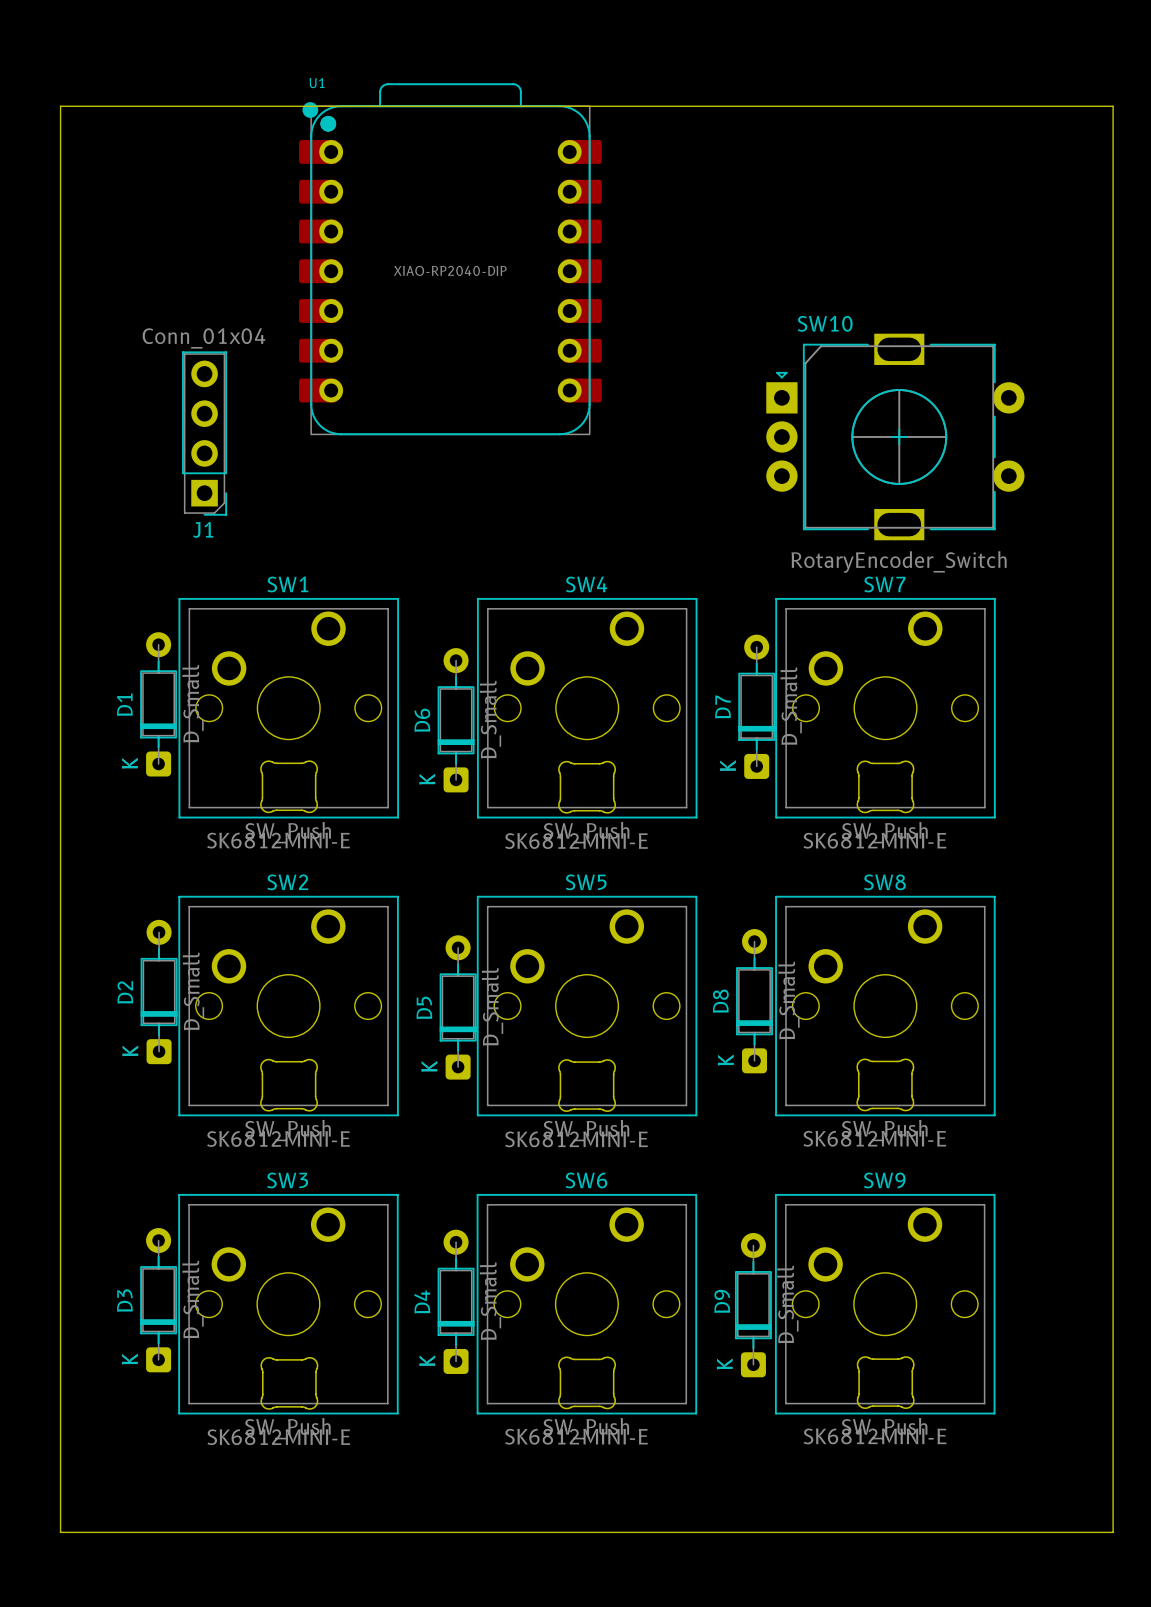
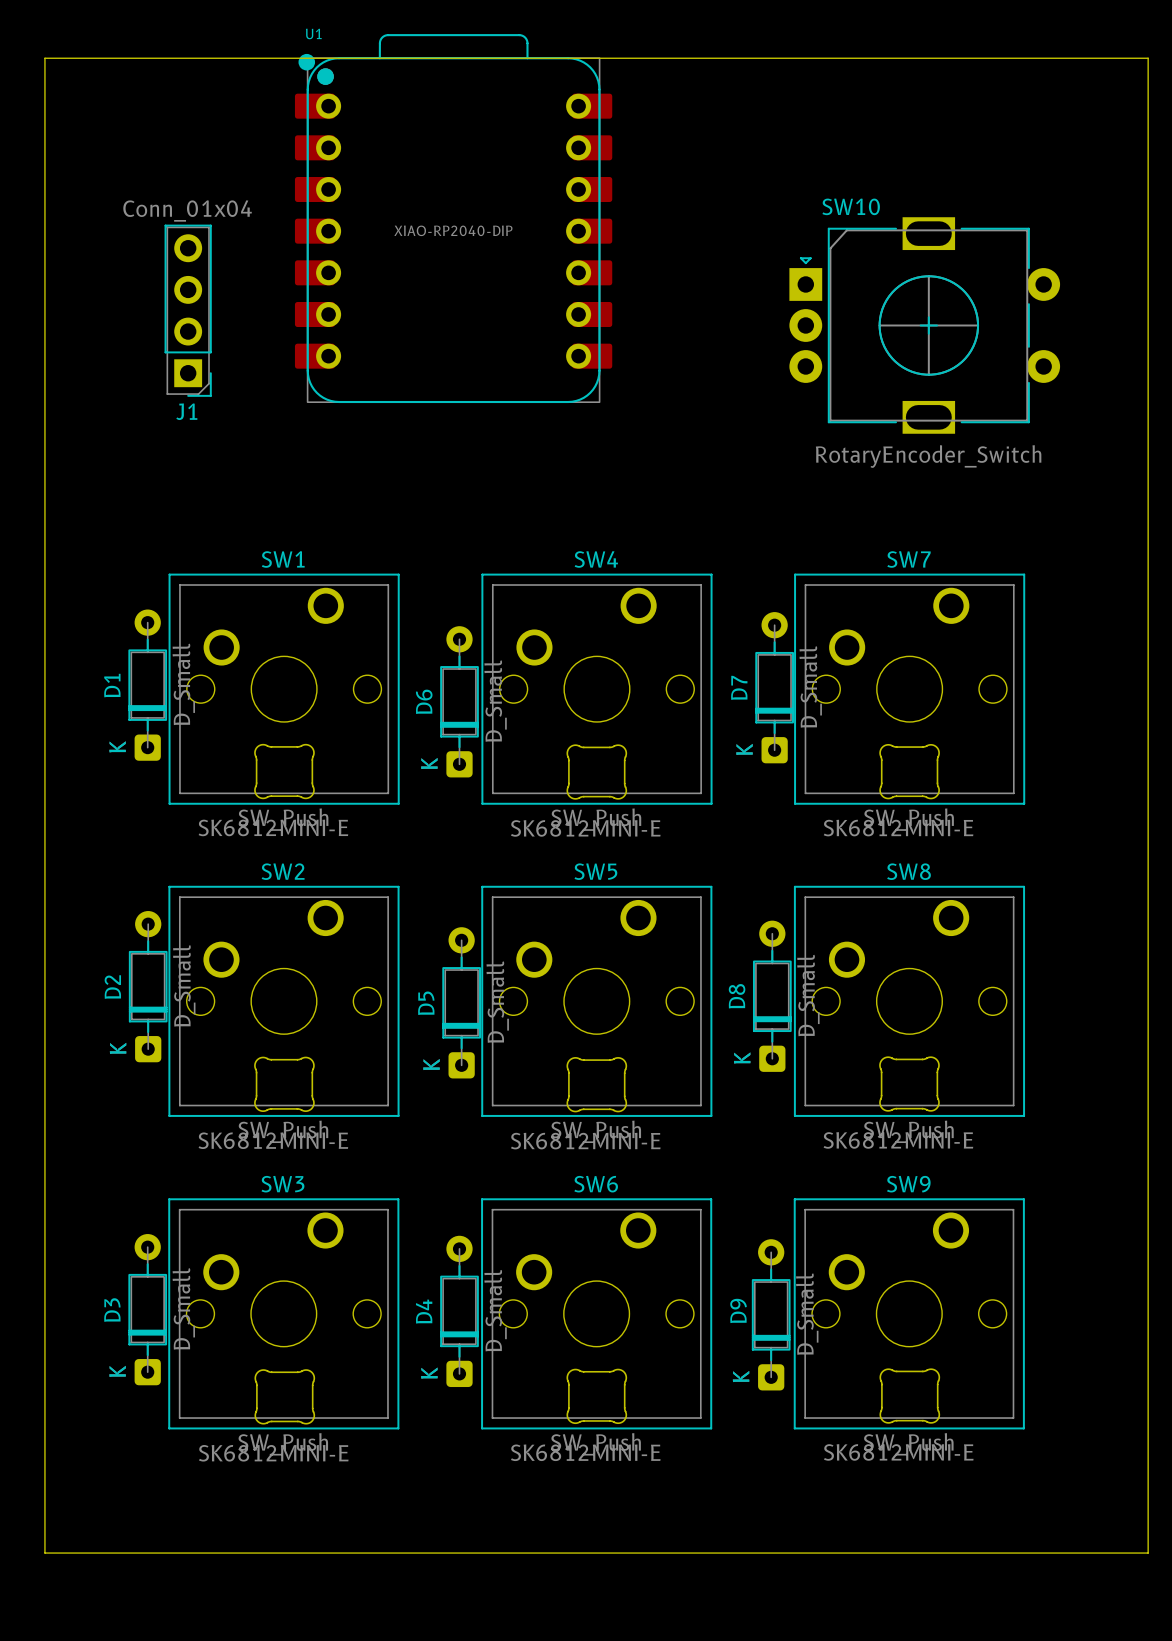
J1 position: (204, 433) -> (188, 310)
SW10 position: (895, 436) -> (924, 325)

